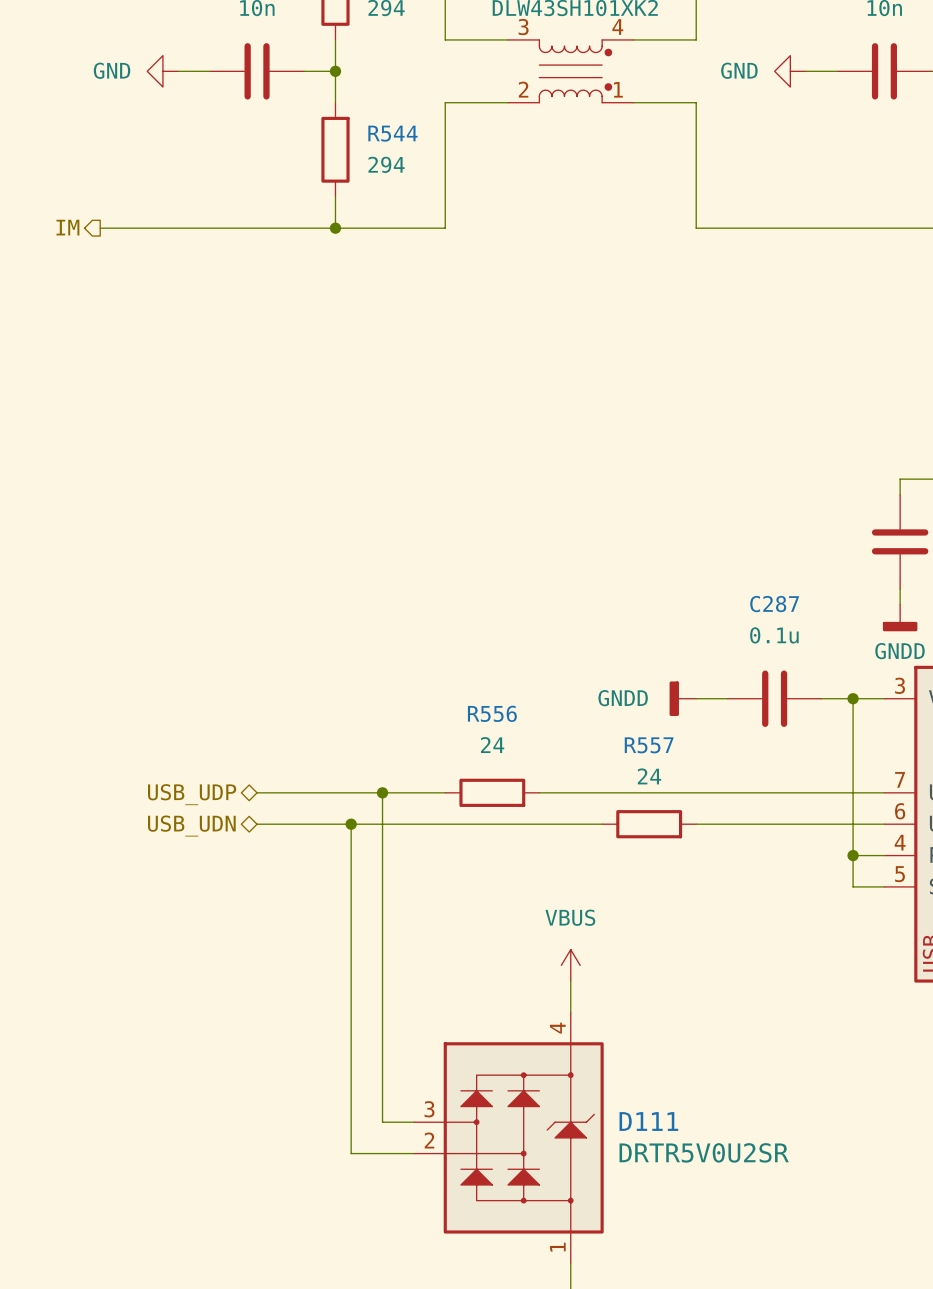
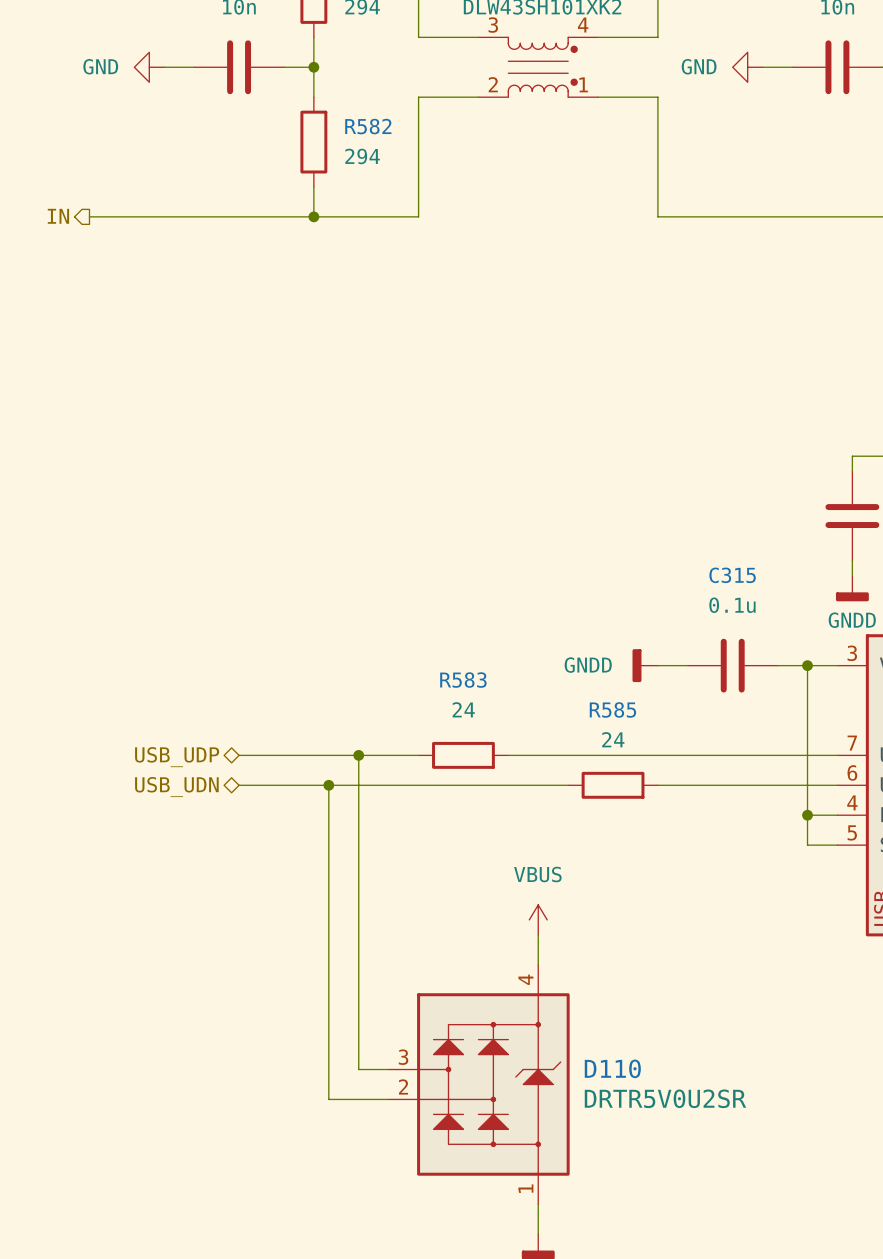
R544 name: R544 (392, 133) -> R582 (368, 126)
hierarchical label: IM (67, 227) -> IN (58, 216)
C287 name: C287 (774, 604) -> C315 (732, 575)
R556 name: R556 (492, 713) -> R583 (463, 680)
R557 name: R557 (649, 745) -> R585 (612, 709)
D111 name: D111 (648, 1121) -> D110 (612, 1068)

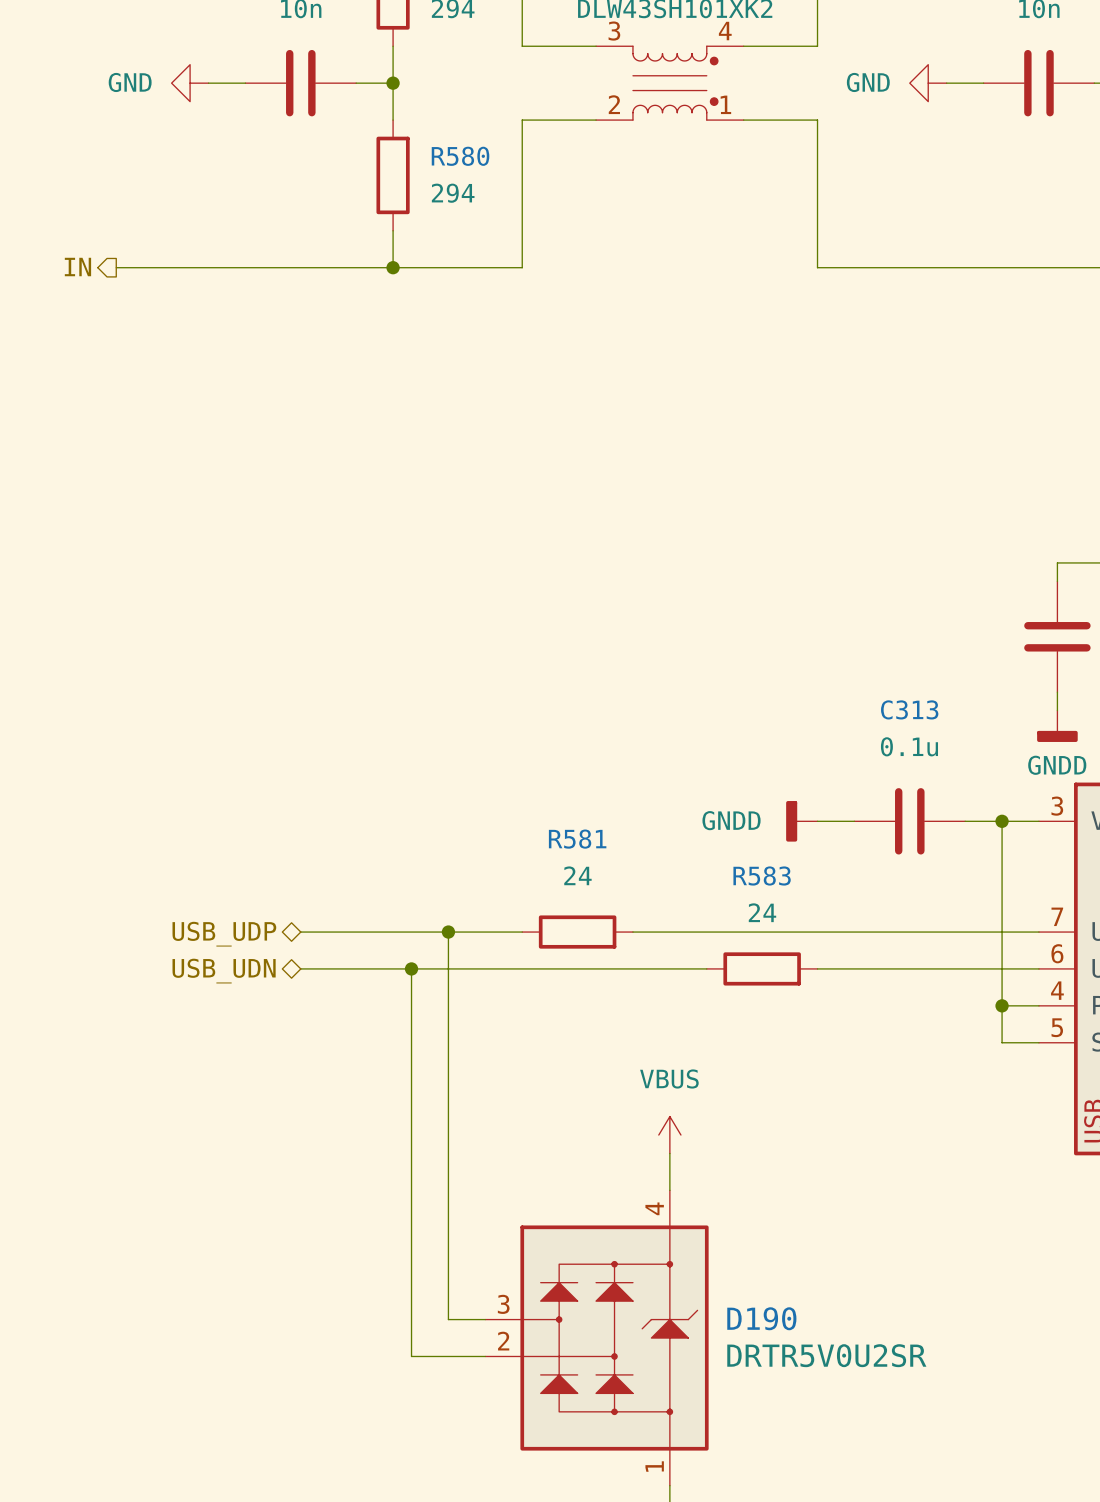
R582 name: R582 (368, 126) -> R580 (460, 156)
C315 name: C315 (732, 575) -> C313 (909, 709)
R583 name: R583 (463, 680) -> R581 (577, 839)
R585 name: R585 (612, 709) -> R583 (762, 876)
D110 name: D110 (612, 1068) -> D190 (761, 1318)

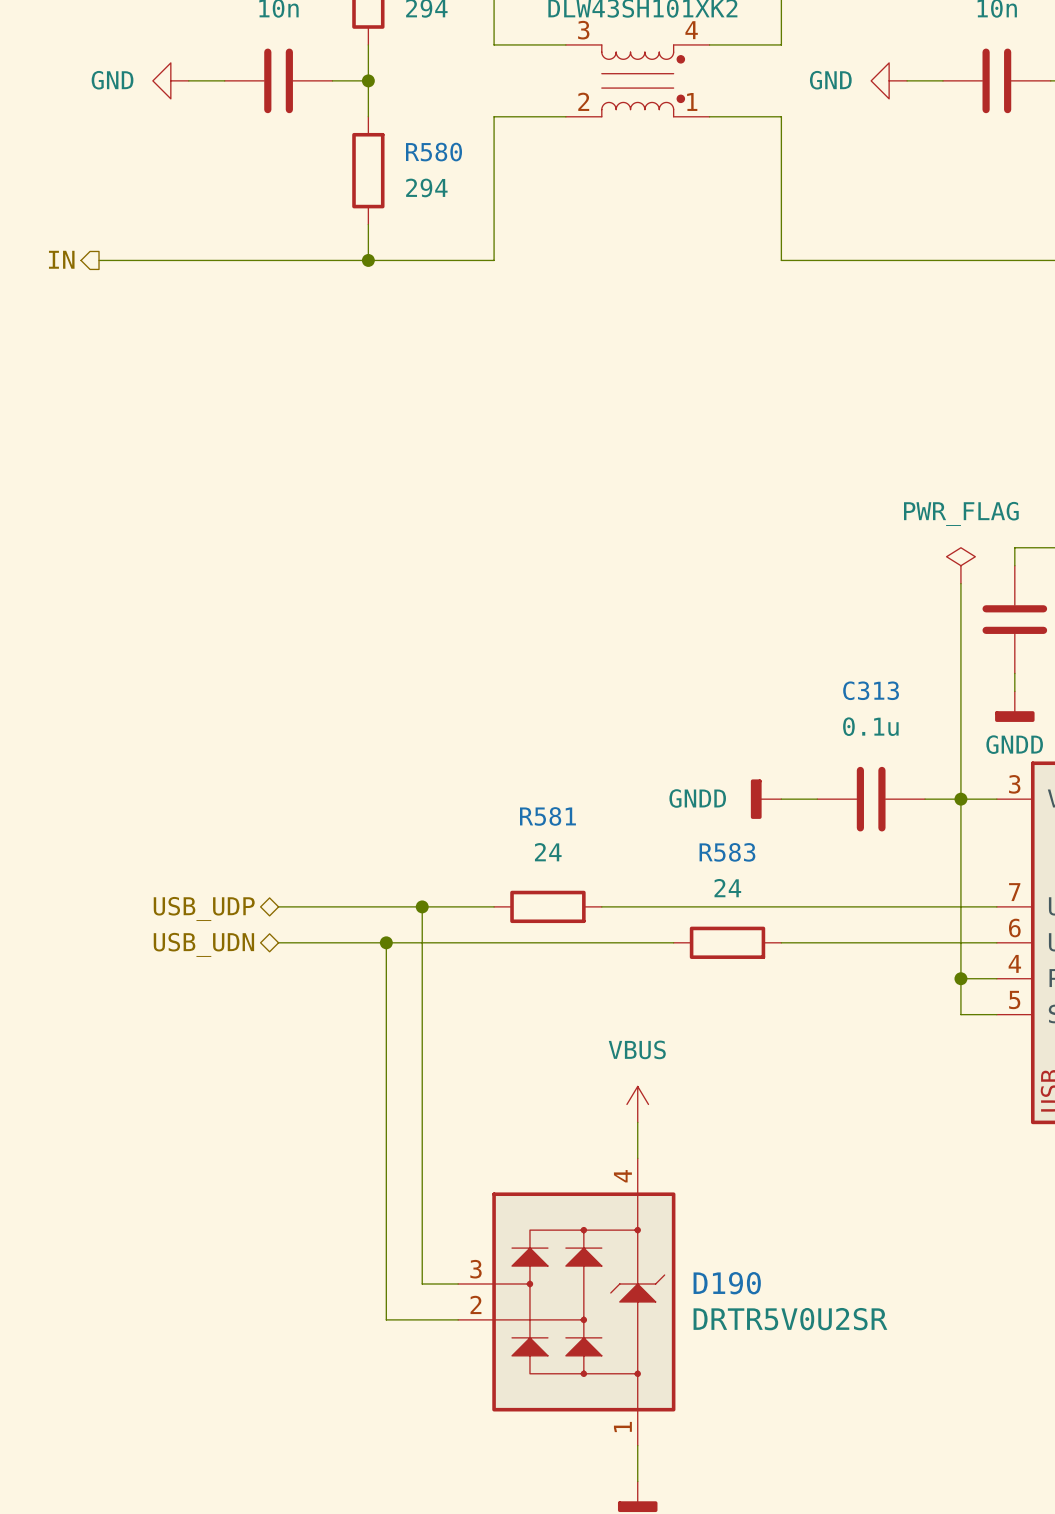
power symbol: none -> PWR_FLAG (960, 565)
wire: none -> (960, 583) (960, 799)

